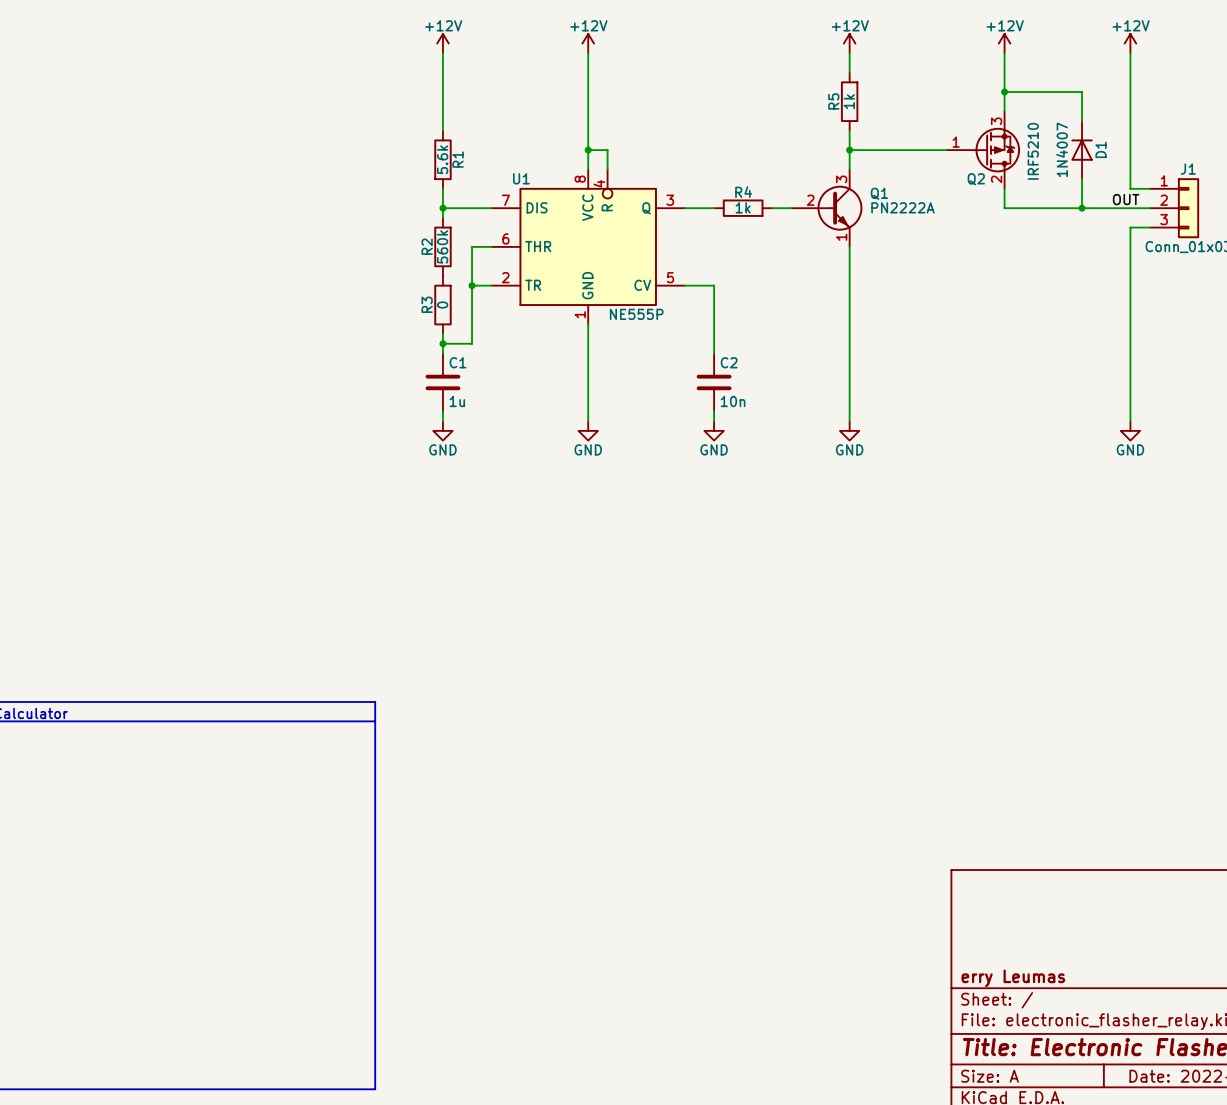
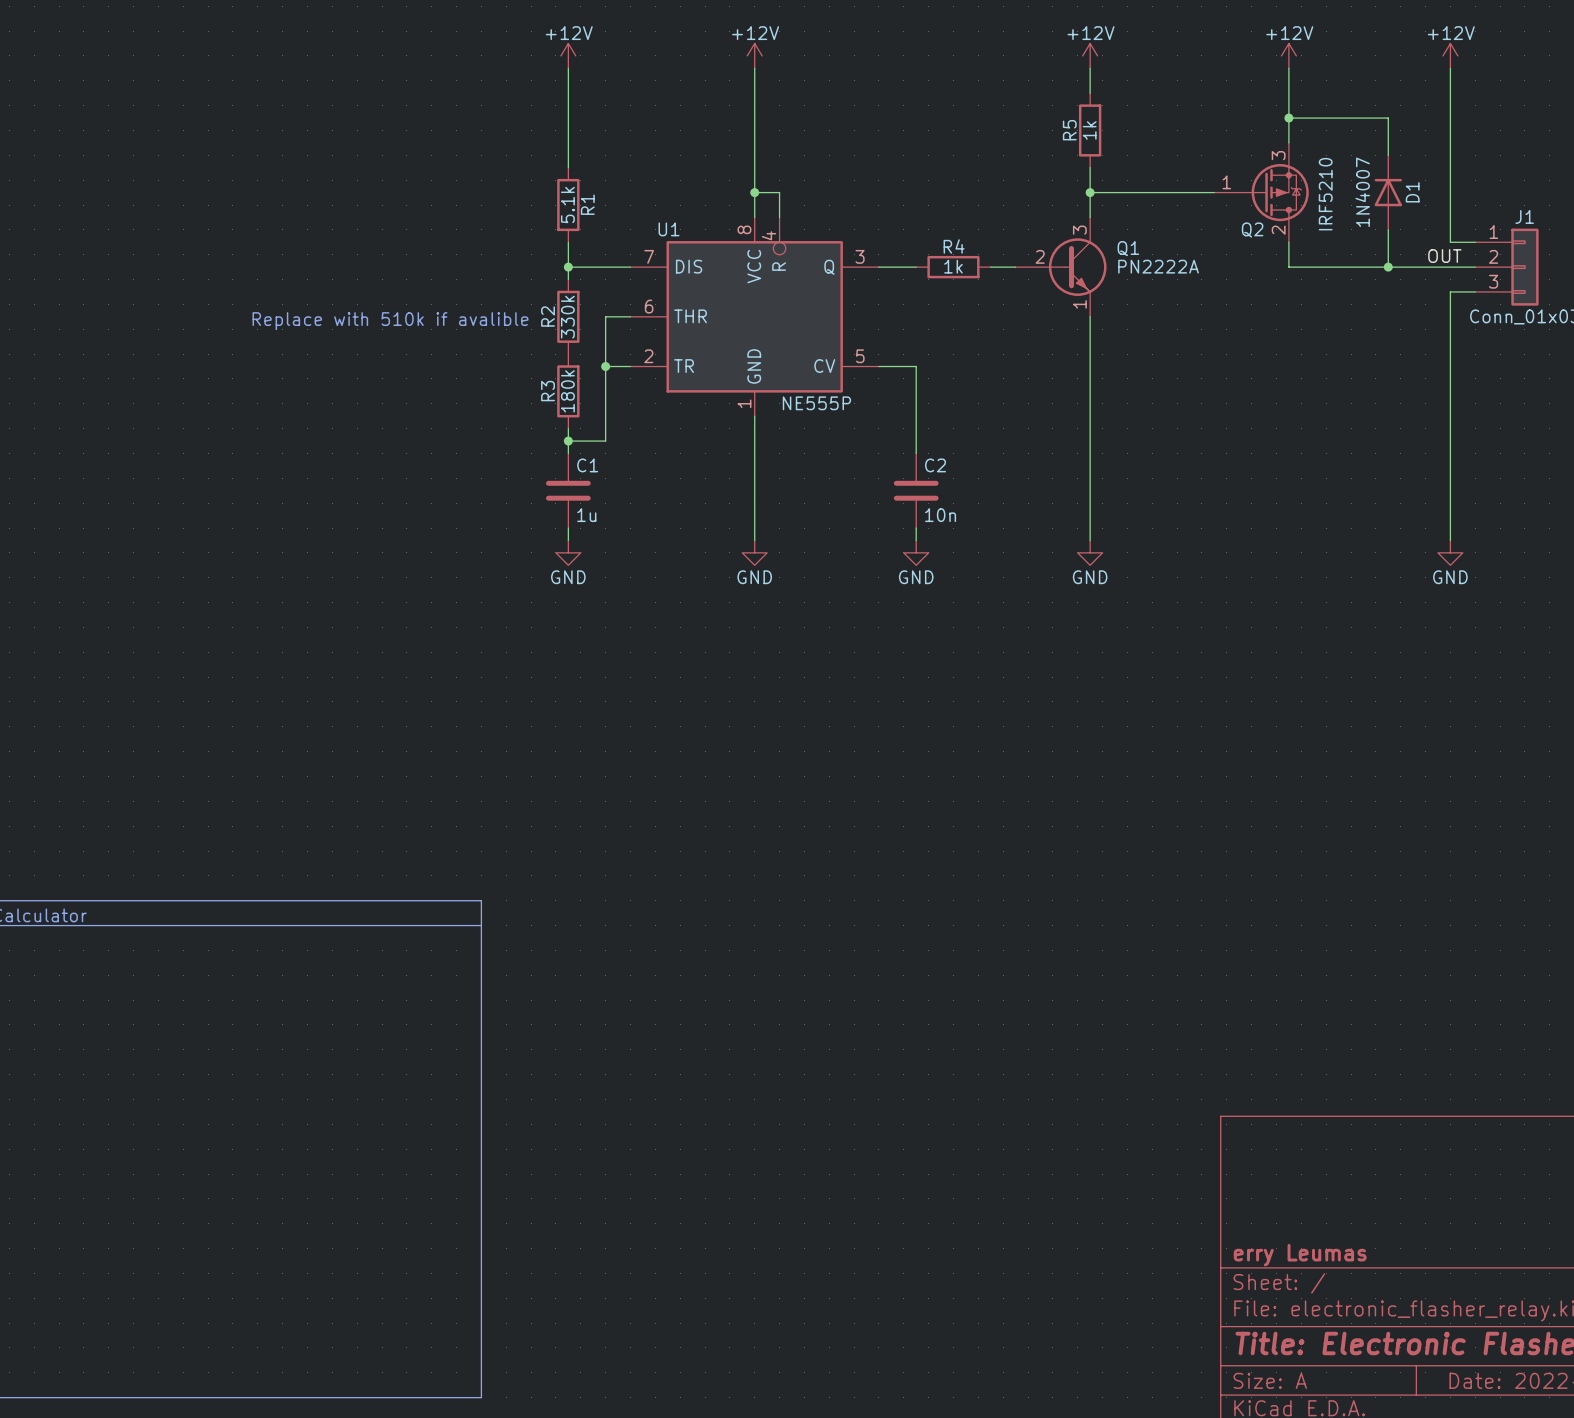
R1 value: 5.6k (442, 159) -> 5.1k (567, 205)
R2 value: 560k (442, 246) -> 330k (567, 317)
text: none -> Replace with 510k if avalible (390, 321)
R3 value: 0 (442, 305) -> 180k (567, 391)

